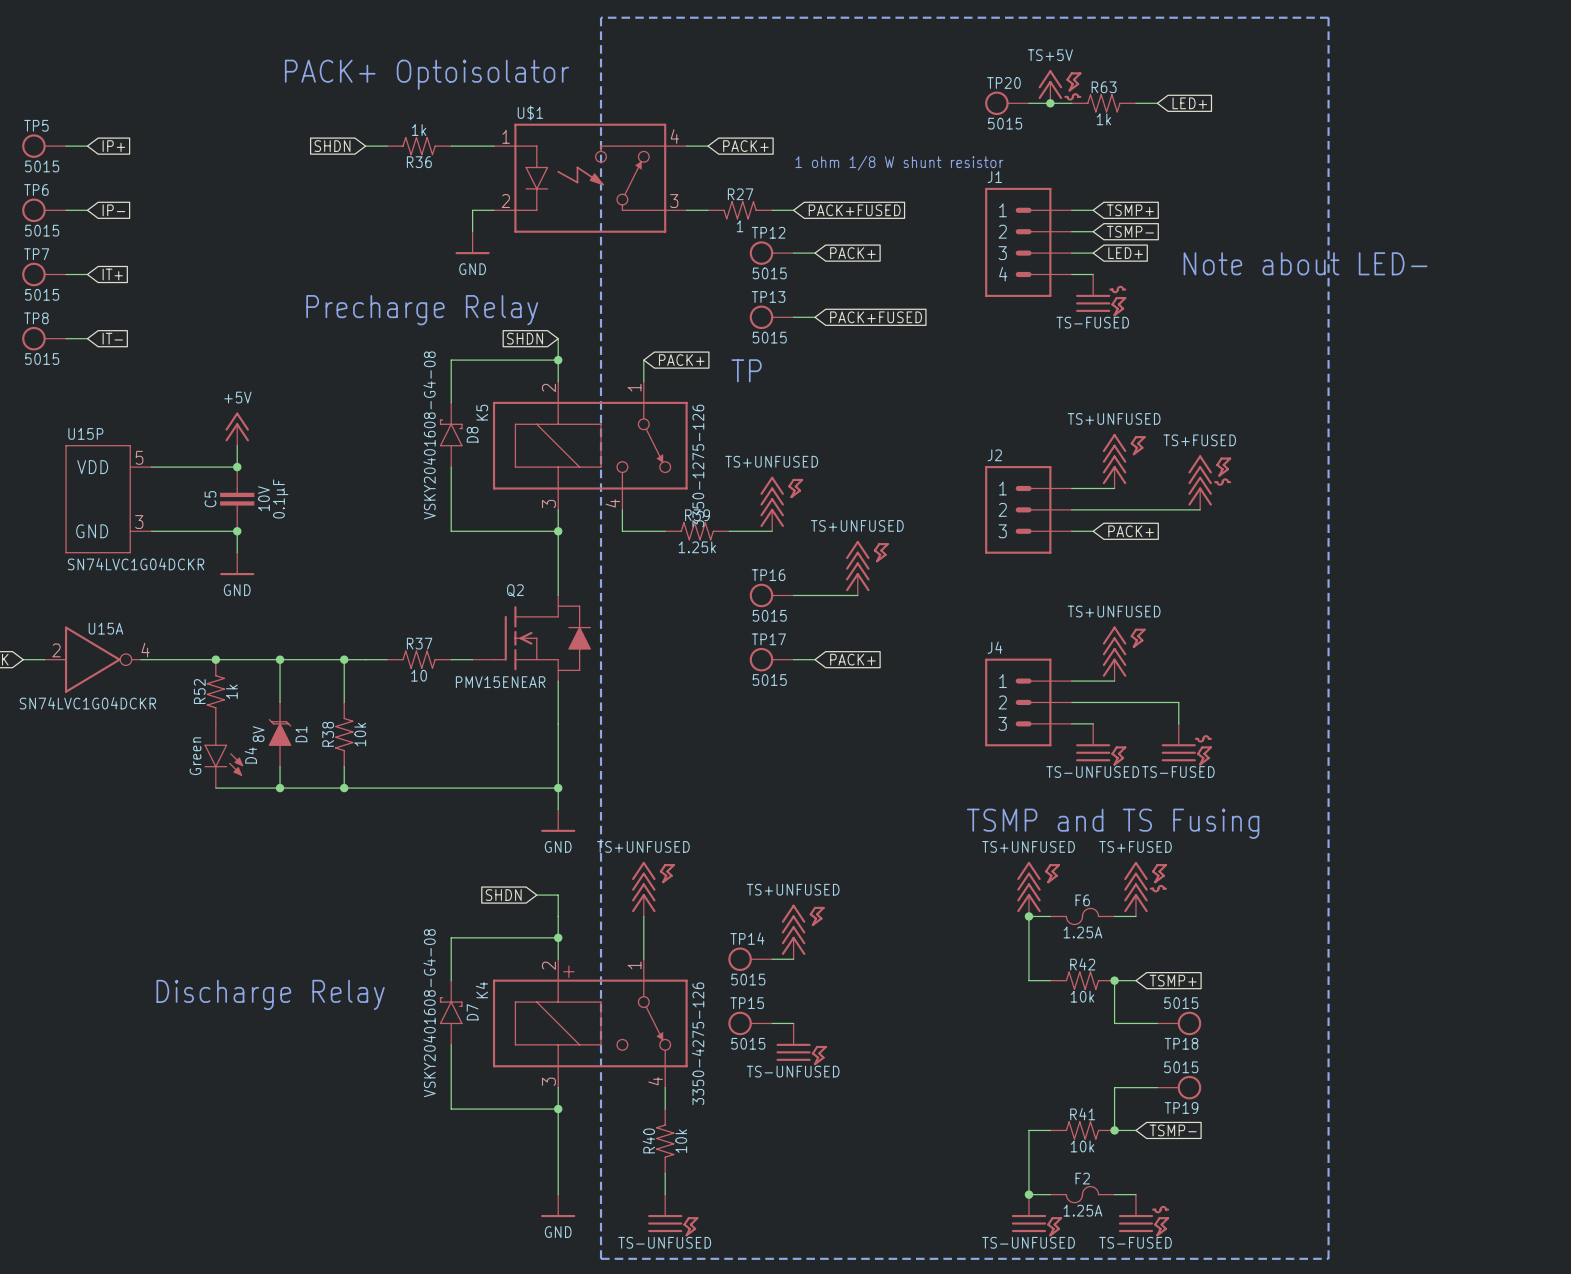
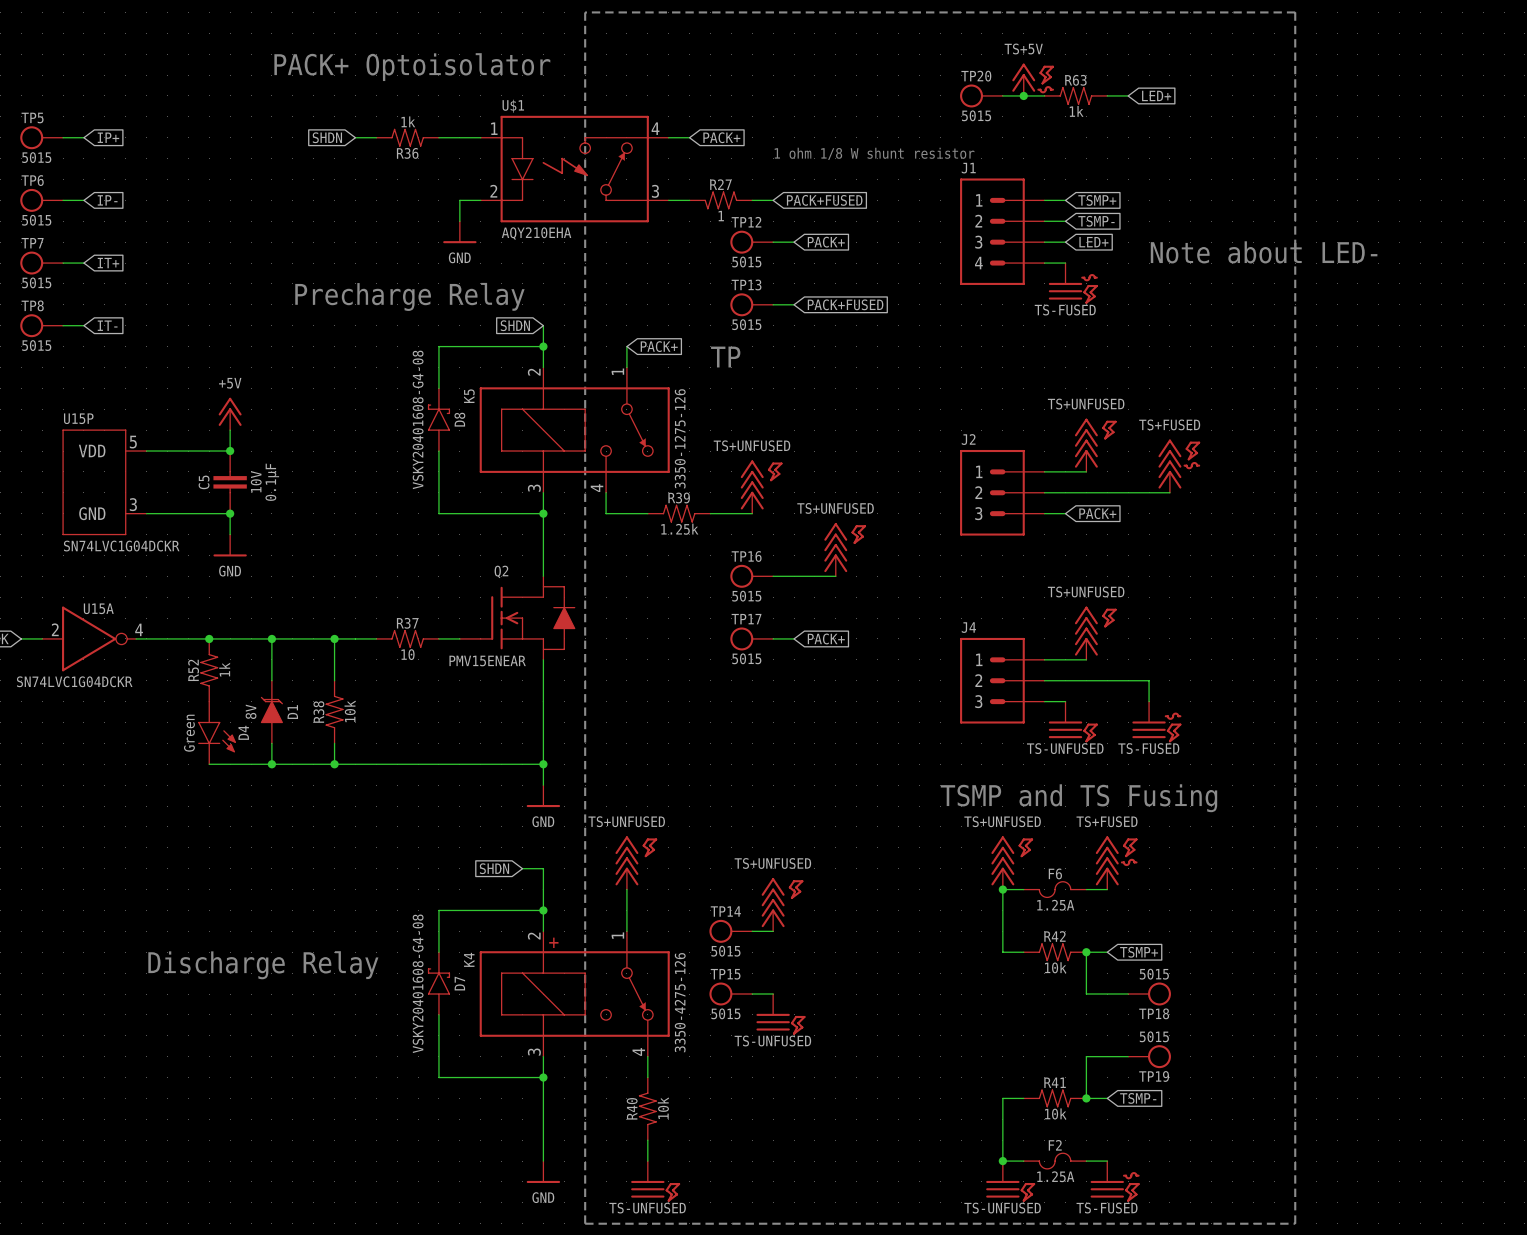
U$1 text: none -> AQY210EHA (536, 233)

